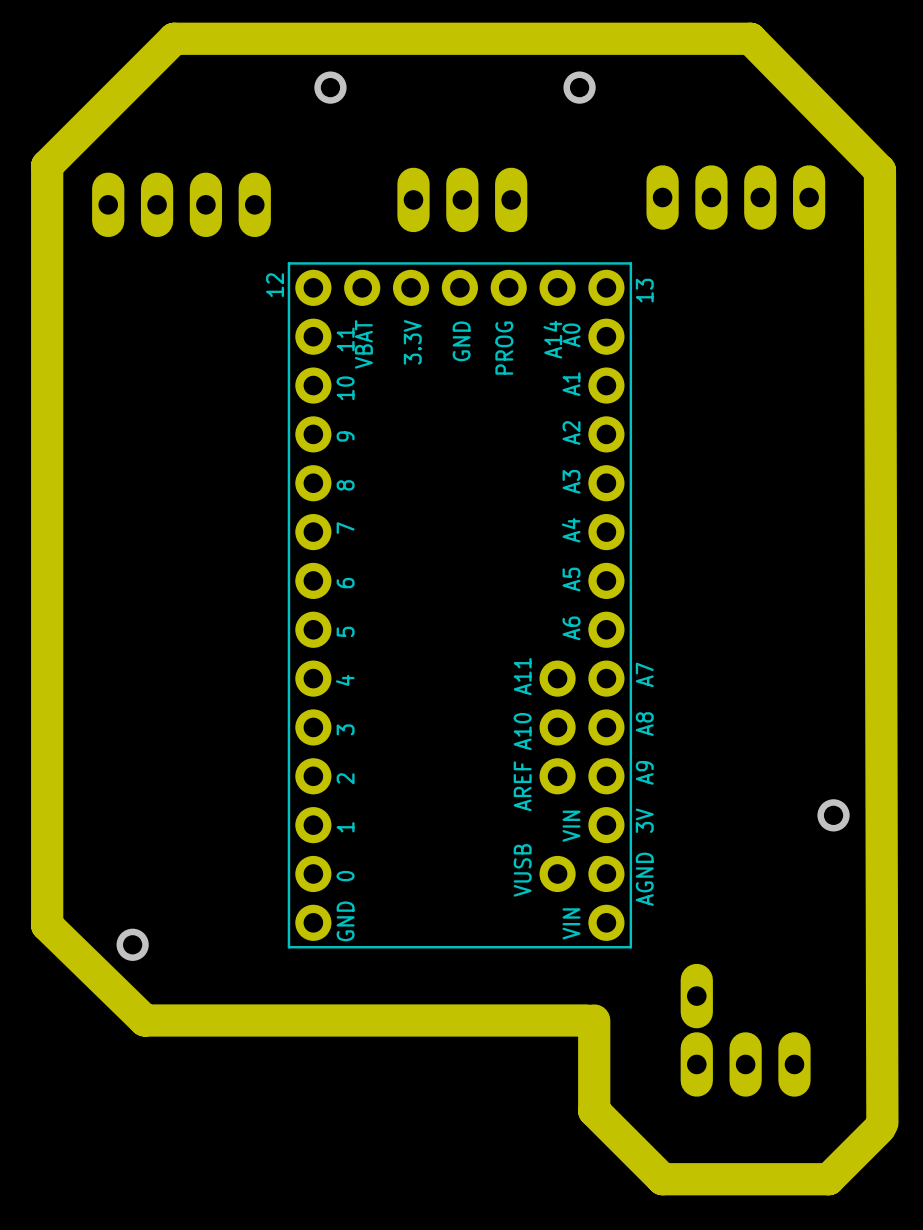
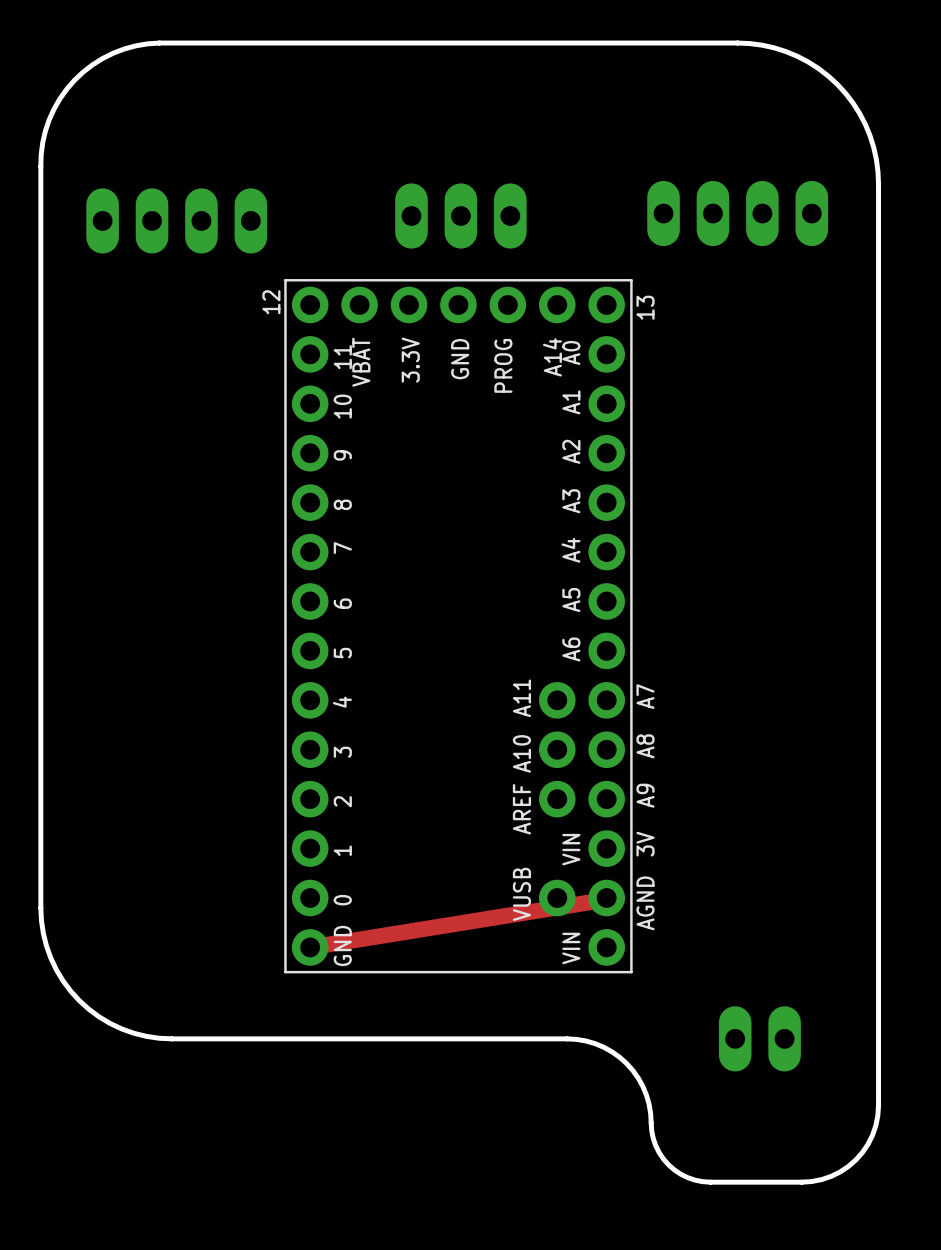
via: (330, 87) -> none
via: (579, 87) -> none
board edge: (47, 165) (174, 38) (750, 38) (879, 170) (882, 1123) -> (40, 181) (41, 154) (45, 131) (53, 109) (66, 89) (83, 72) (102, 58) (124, 48) (147, 43) (749, 43) (785, 51) (808, 61) (828, 75) (845, 93) (859, 113) (870, 135) (876, 159) (878, 183) (878, 1105) (875, 1125) (868, 1143) (856, 1159) (840, 1171) (821, 1179) (801, 1182) (710, 1182) (695, 1180) (674, 1169) (663, 1158) (653, 1138) (649, 1104) (642, 1086) (626, 1063) (603, 1047) (585, 1040) (567, 1038) (171, 1038) (146, 1036) (110, 1023) (88, 1009) (70, 990) (56, 969) (46, 945) (40, 907)
board edge width: thick (47, 165) (47, 883) -> thin (40, 181) (40, 907)
via: (833, 815) -> none
track: none -> (606, 898) (616, 898) (310, 947)
board edge: (47, 883) (47, 925) (144, 1020) (586, 1020) -> none
via: (132, 944) -> none
part: (696, 996) -> none
part: none -> (759, 1038)
board edge: (594, 1020) (594, 1110) (662, 1179) (828, 1179) (879, 1127) -> none
part: (745, 1064) -> none

